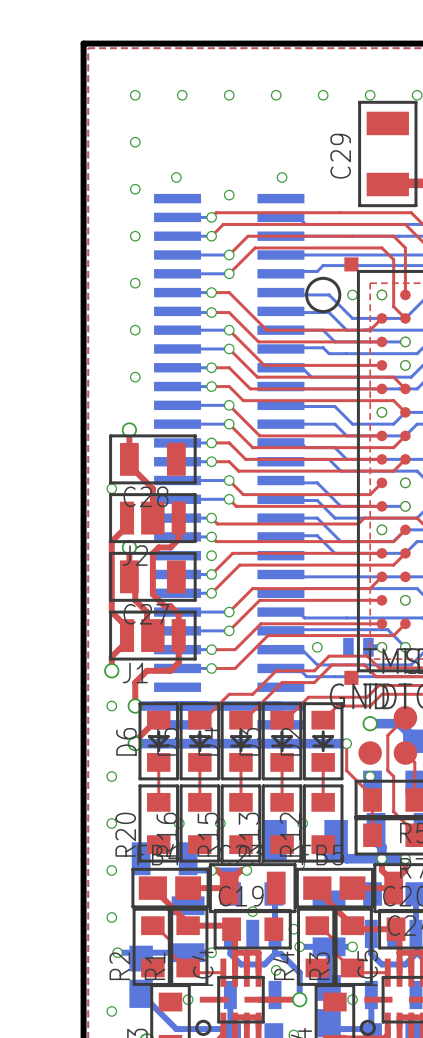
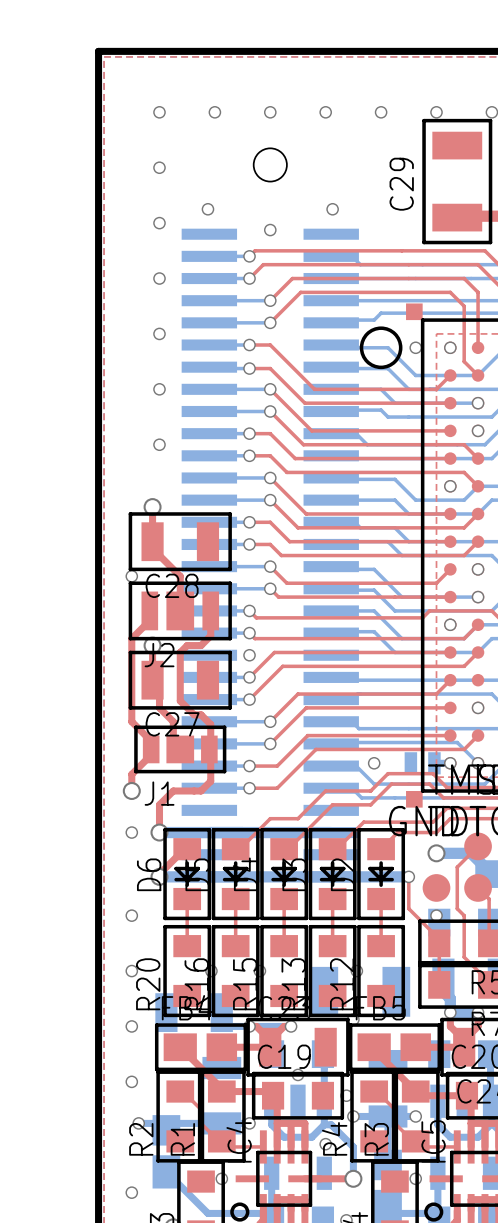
part: none -> (270, 515)
part: (229, 471) -> none
J1 footprint: [109, 610, 197, 661] -> [134, 725, 227, 774]
bottom track: (336, 841) (336, 848) (346, 858) (381, 858) -> none

